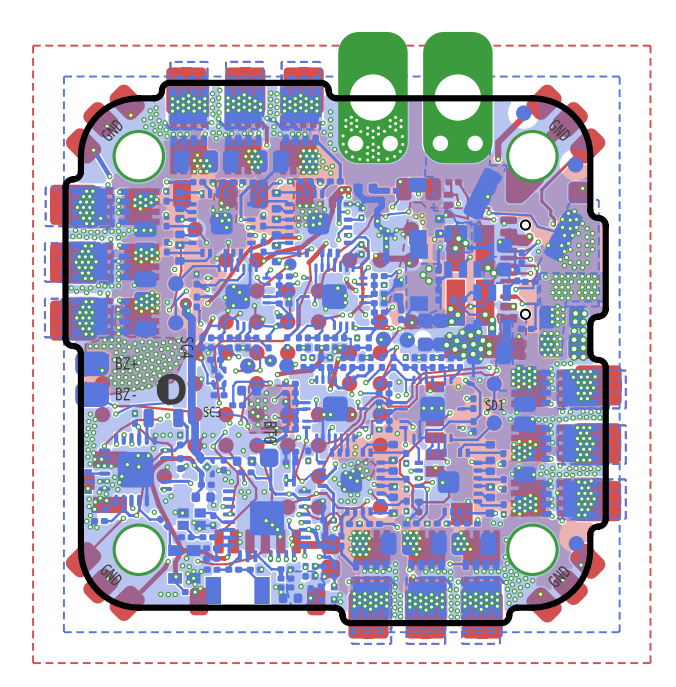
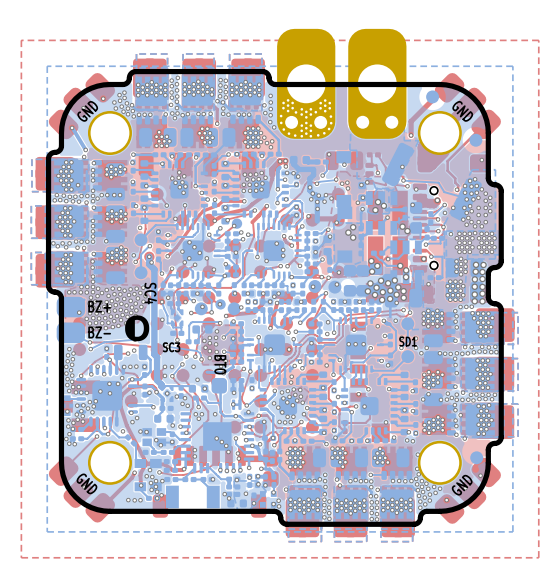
bottom track: (510, 247) (515, 250) (515, 268) -> none

